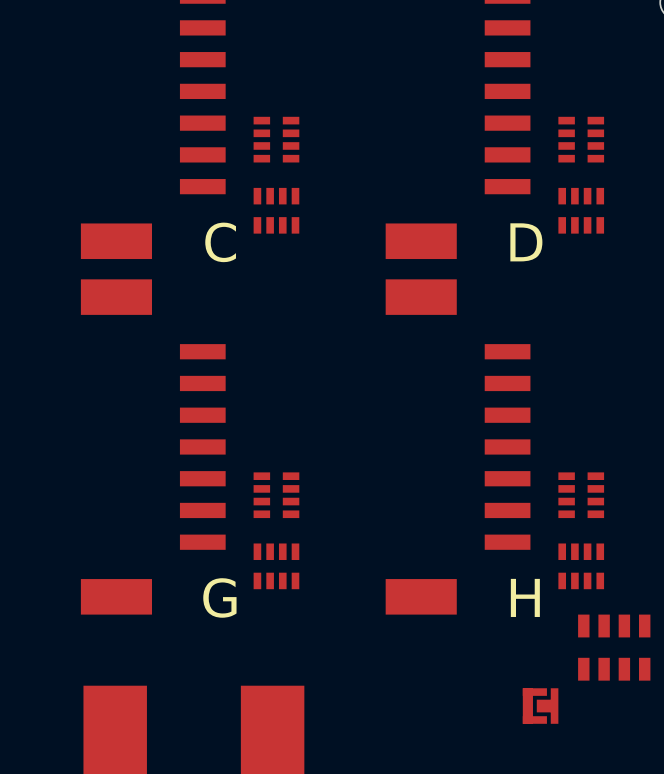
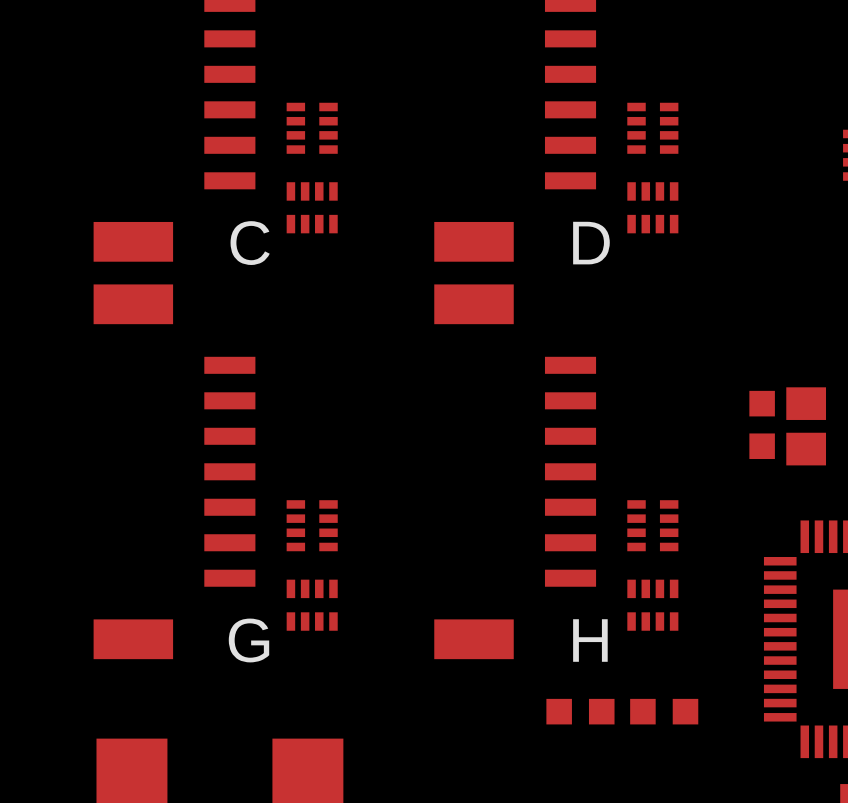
part: (614, 647) -> none
part: none -> (580, 711)
part: none -> (664, 711)
part: (540, 706) -> none

